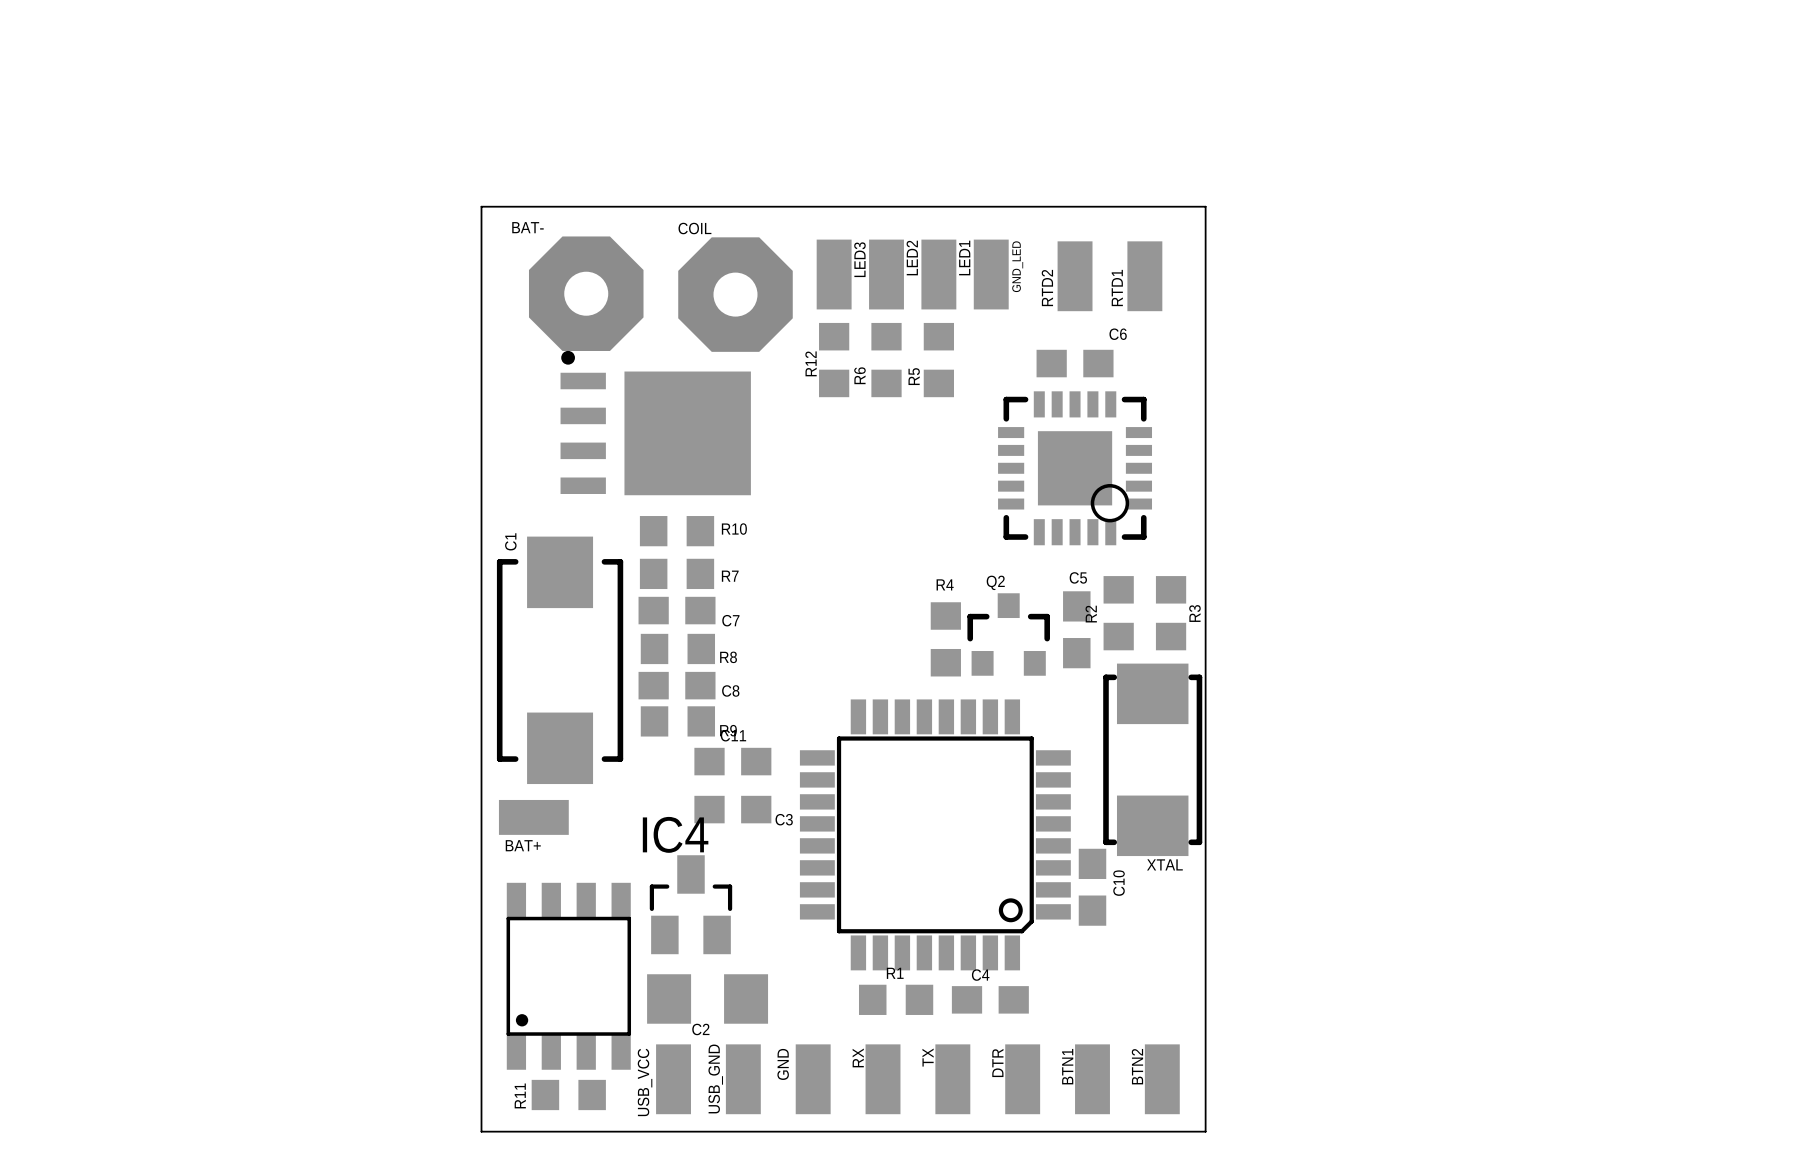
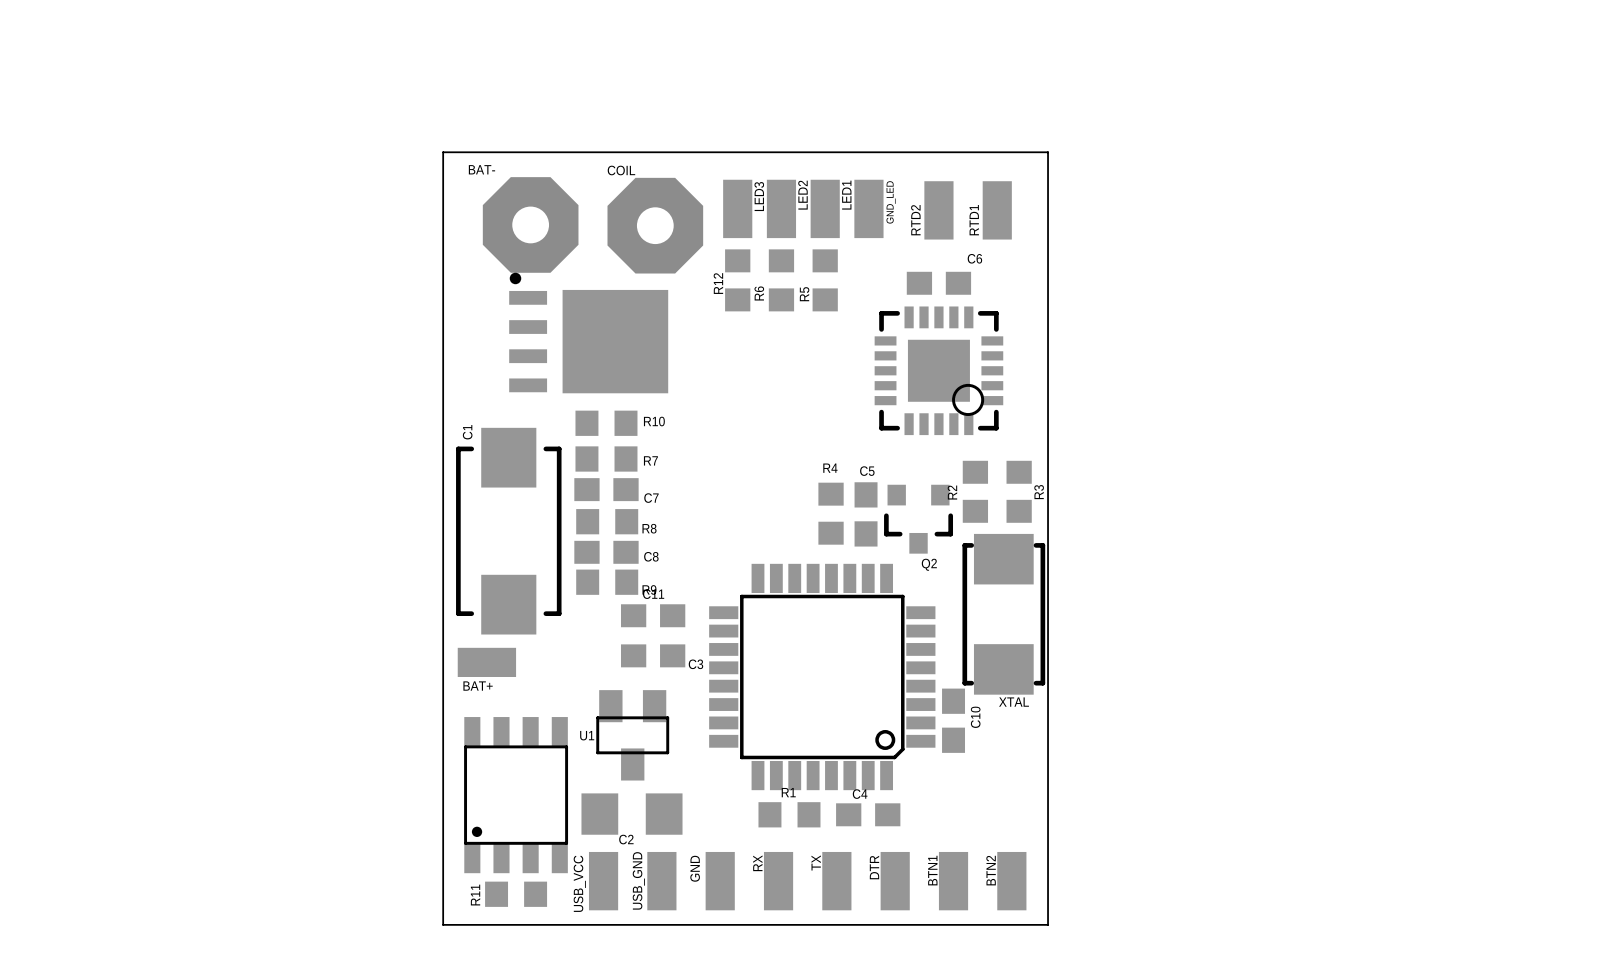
C5 position: (1076, 629) -> (866, 514)
Q2 rotation: 0° (1008, 634) -> 180° (918, 519)
IC4: (690, 904) -> none
U1: none -> (632, 735)

